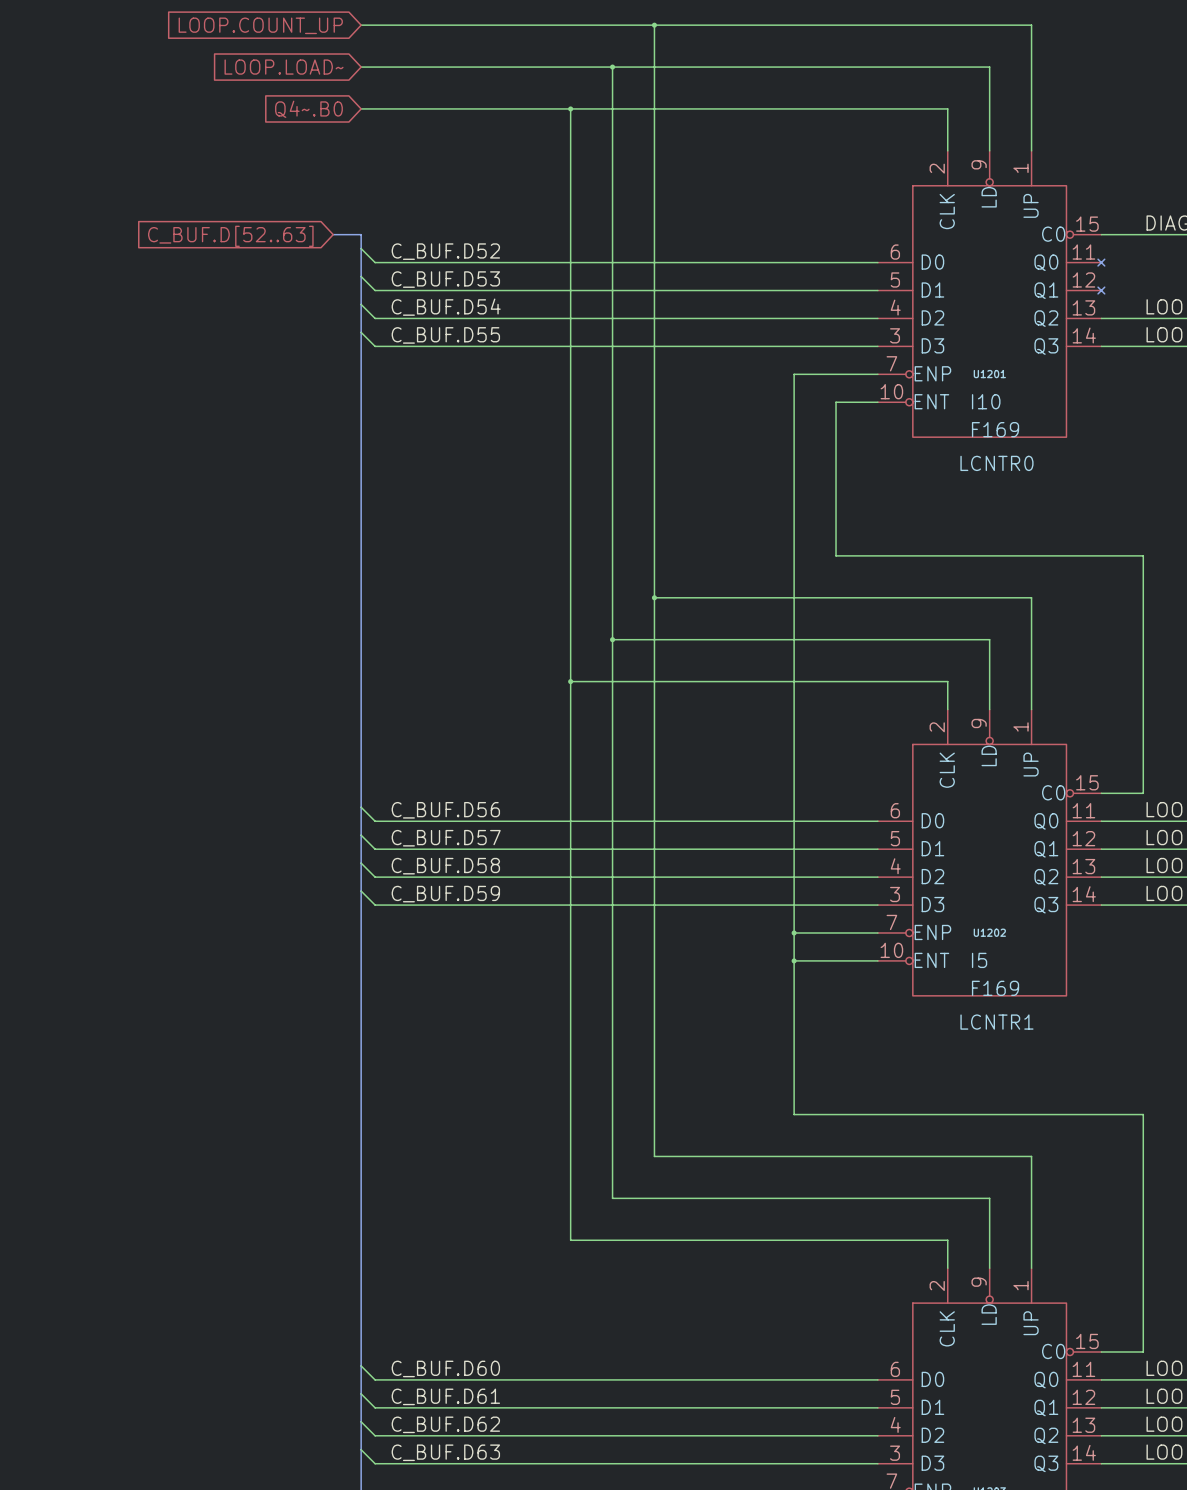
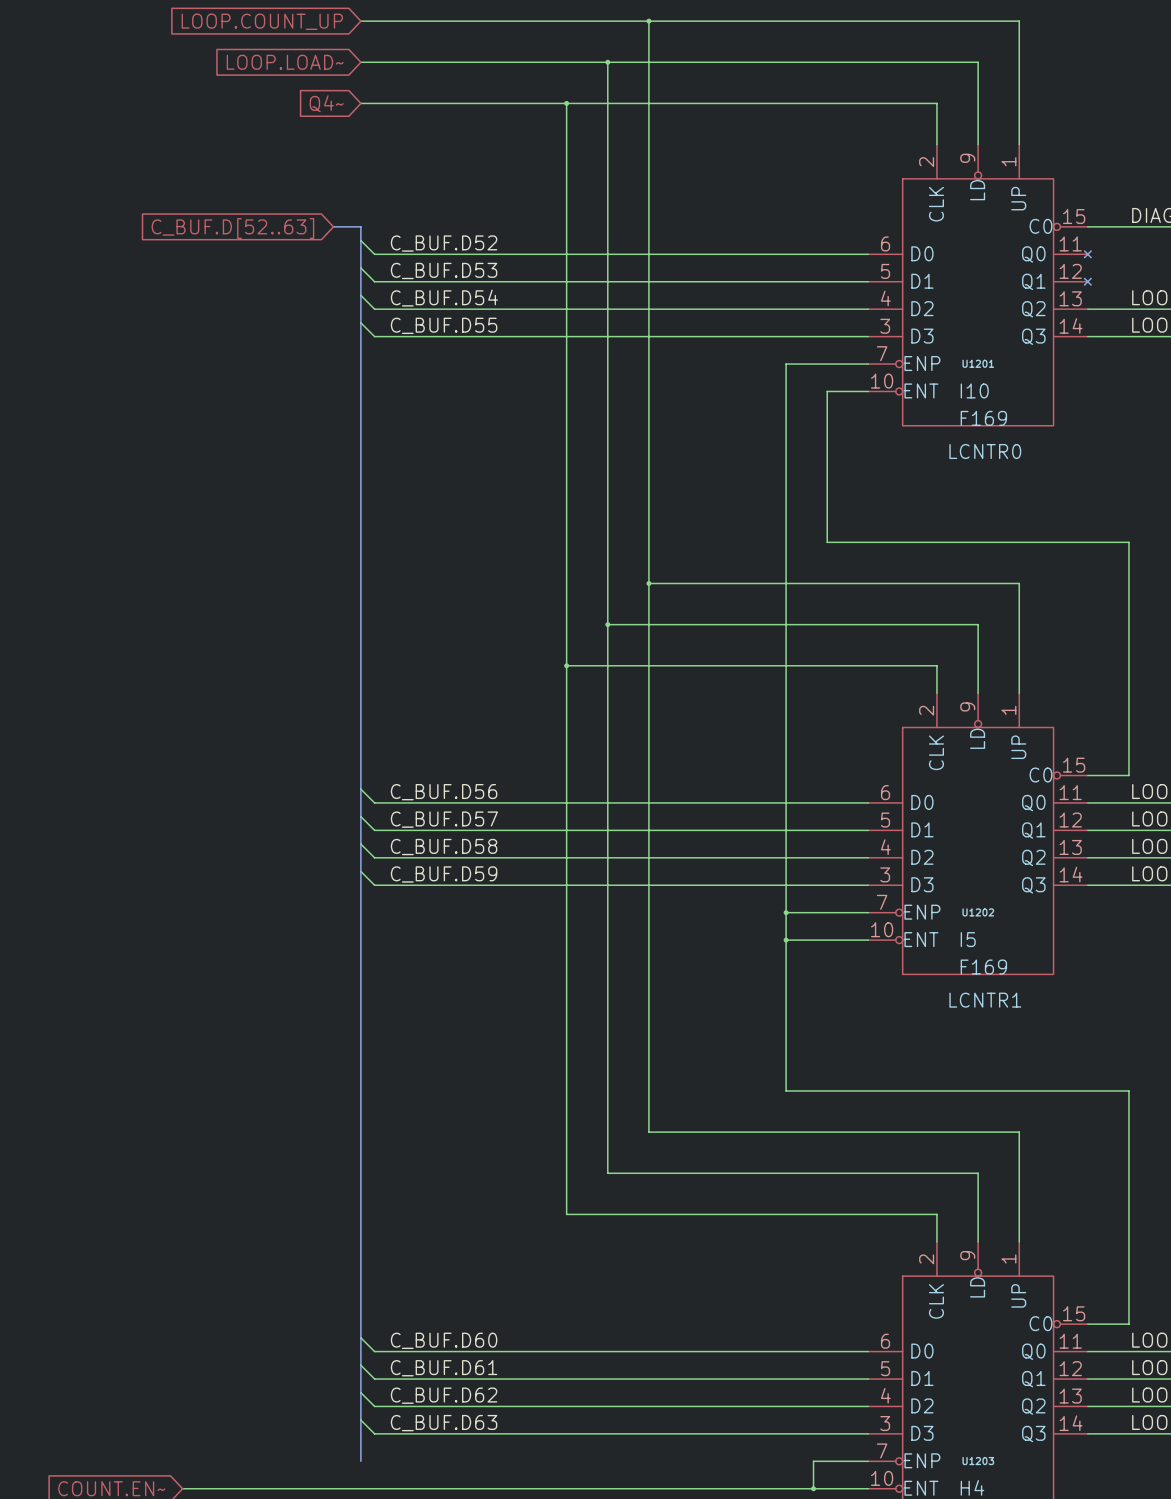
global label: Q4~.B0 (308, 109) -> Q4~ (326, 103)

